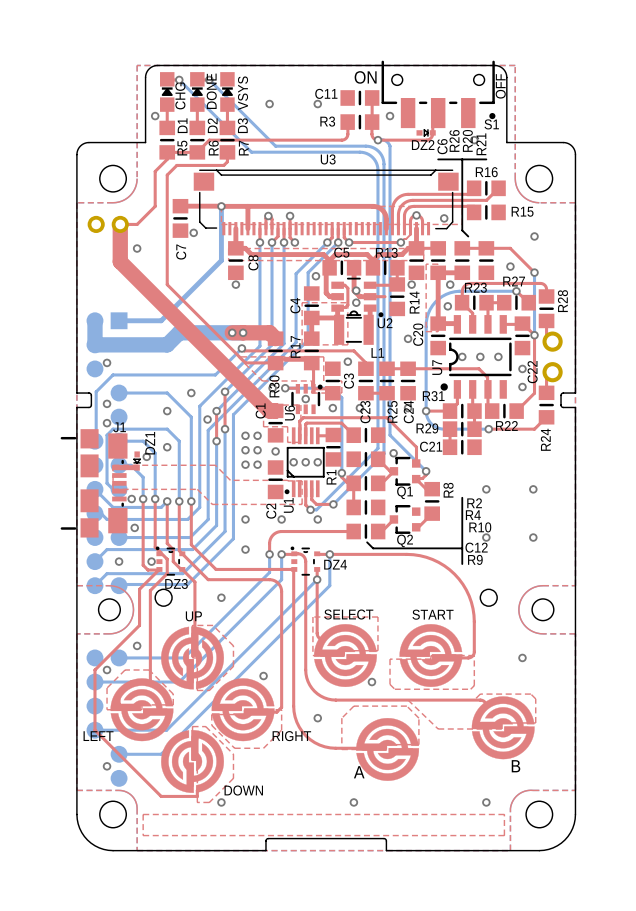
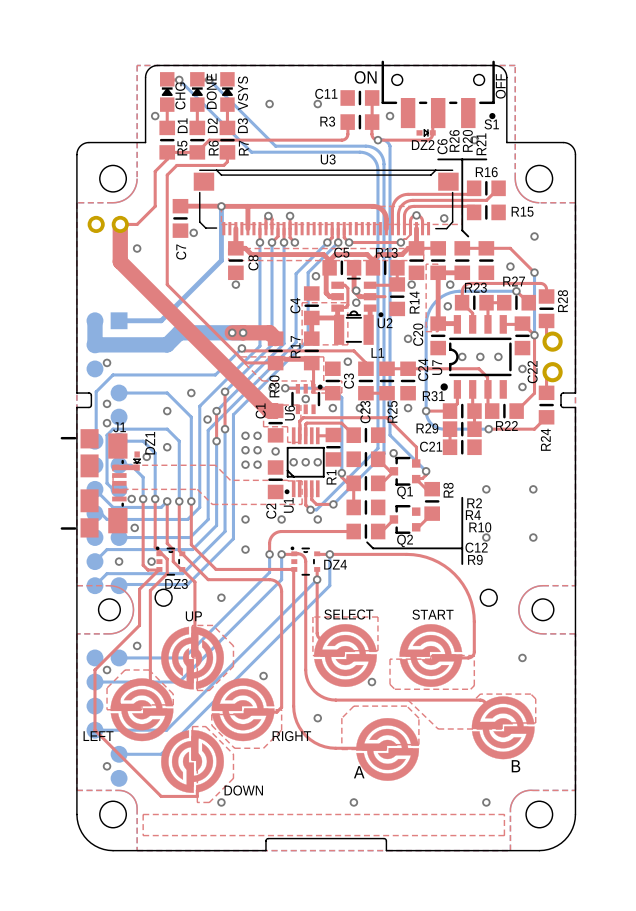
C24 name position: C24 (408, 412) -> C24 (423, 369)

